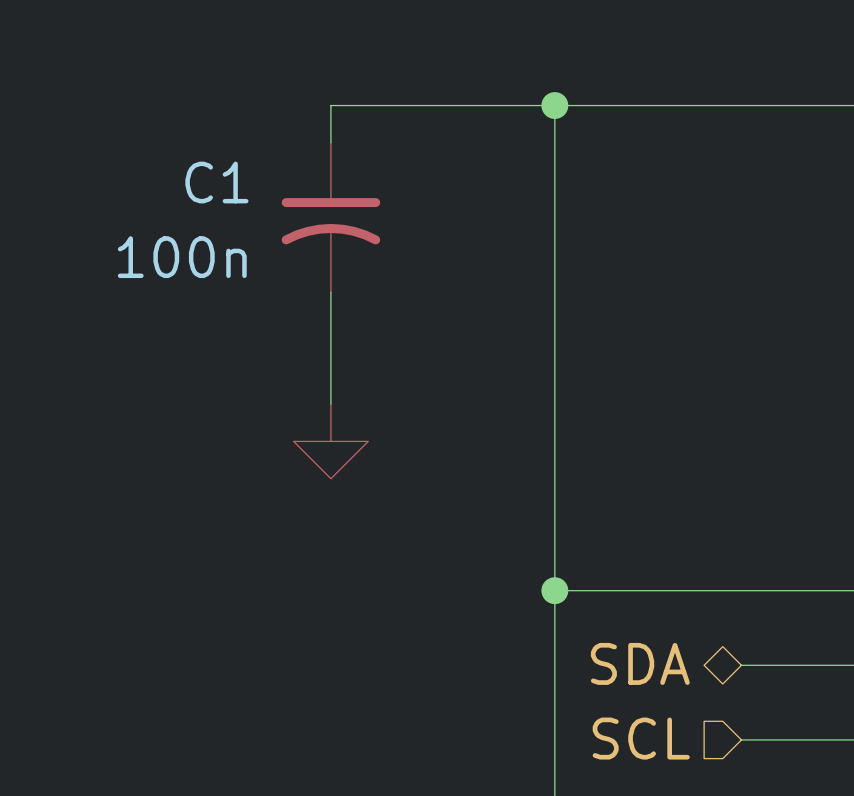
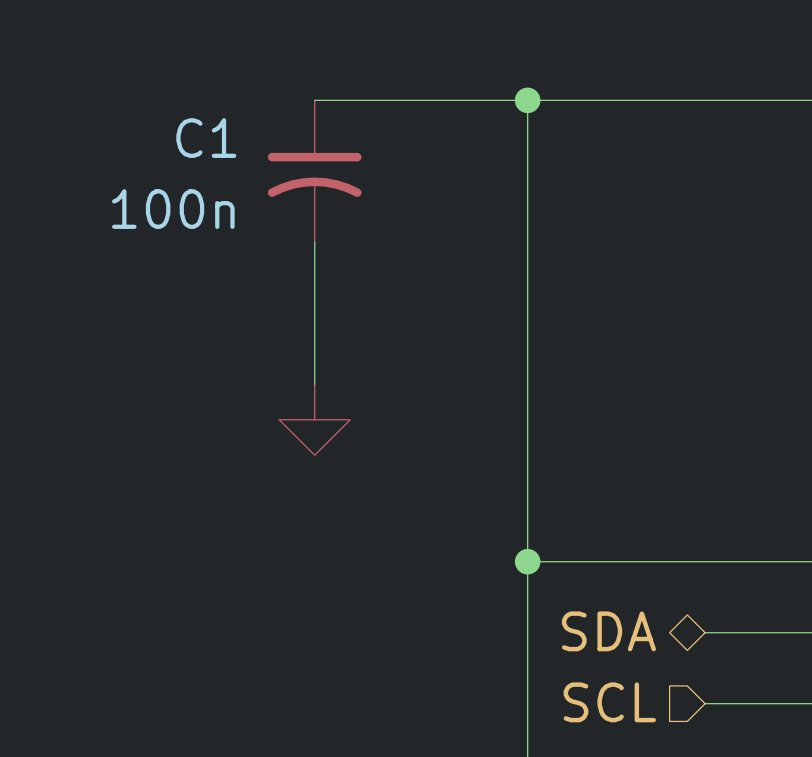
C1 position: (330, 217) -> (314, 171)

